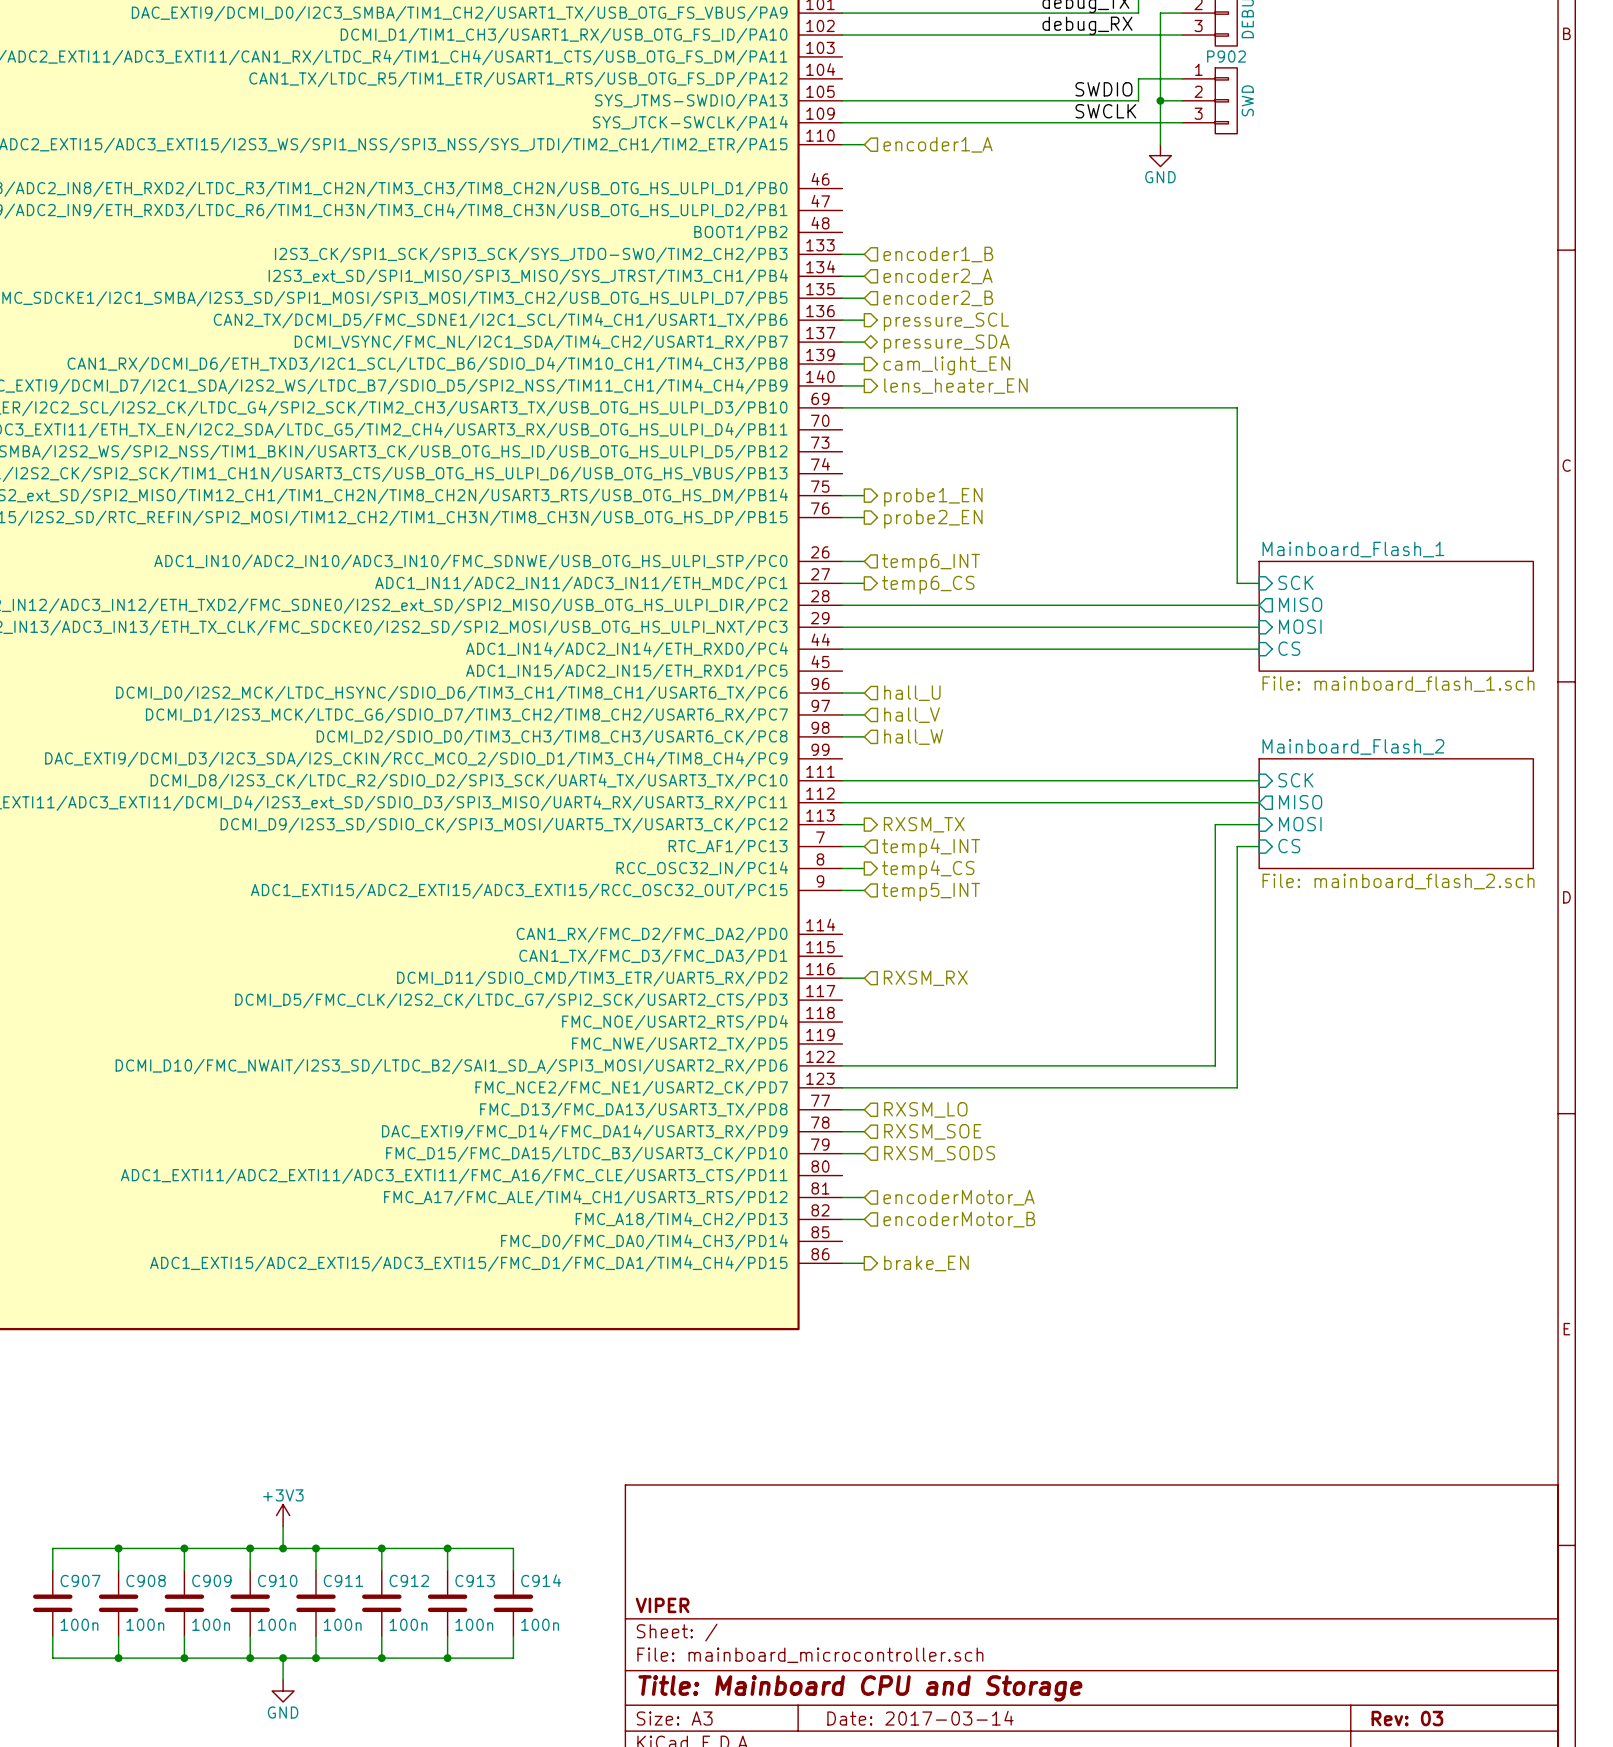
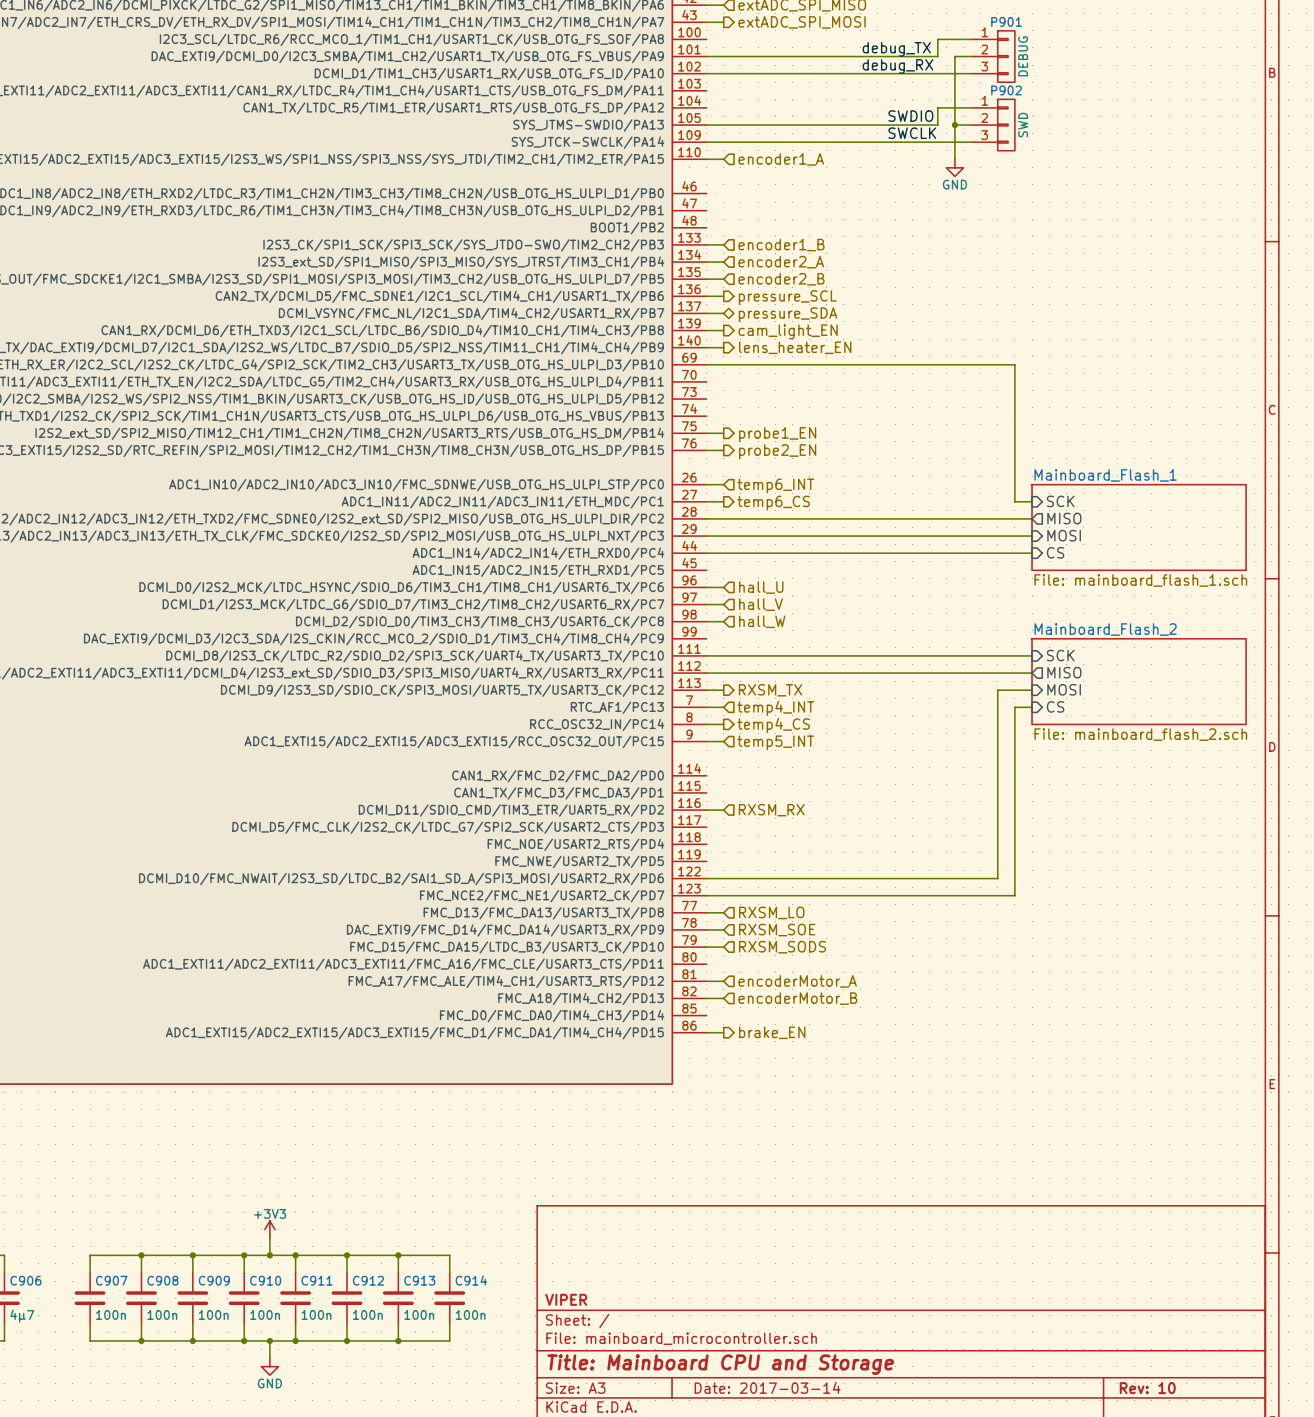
title block: Rev: 03 (1407, 1718) -> Rev: 10 (1147, 1388)

